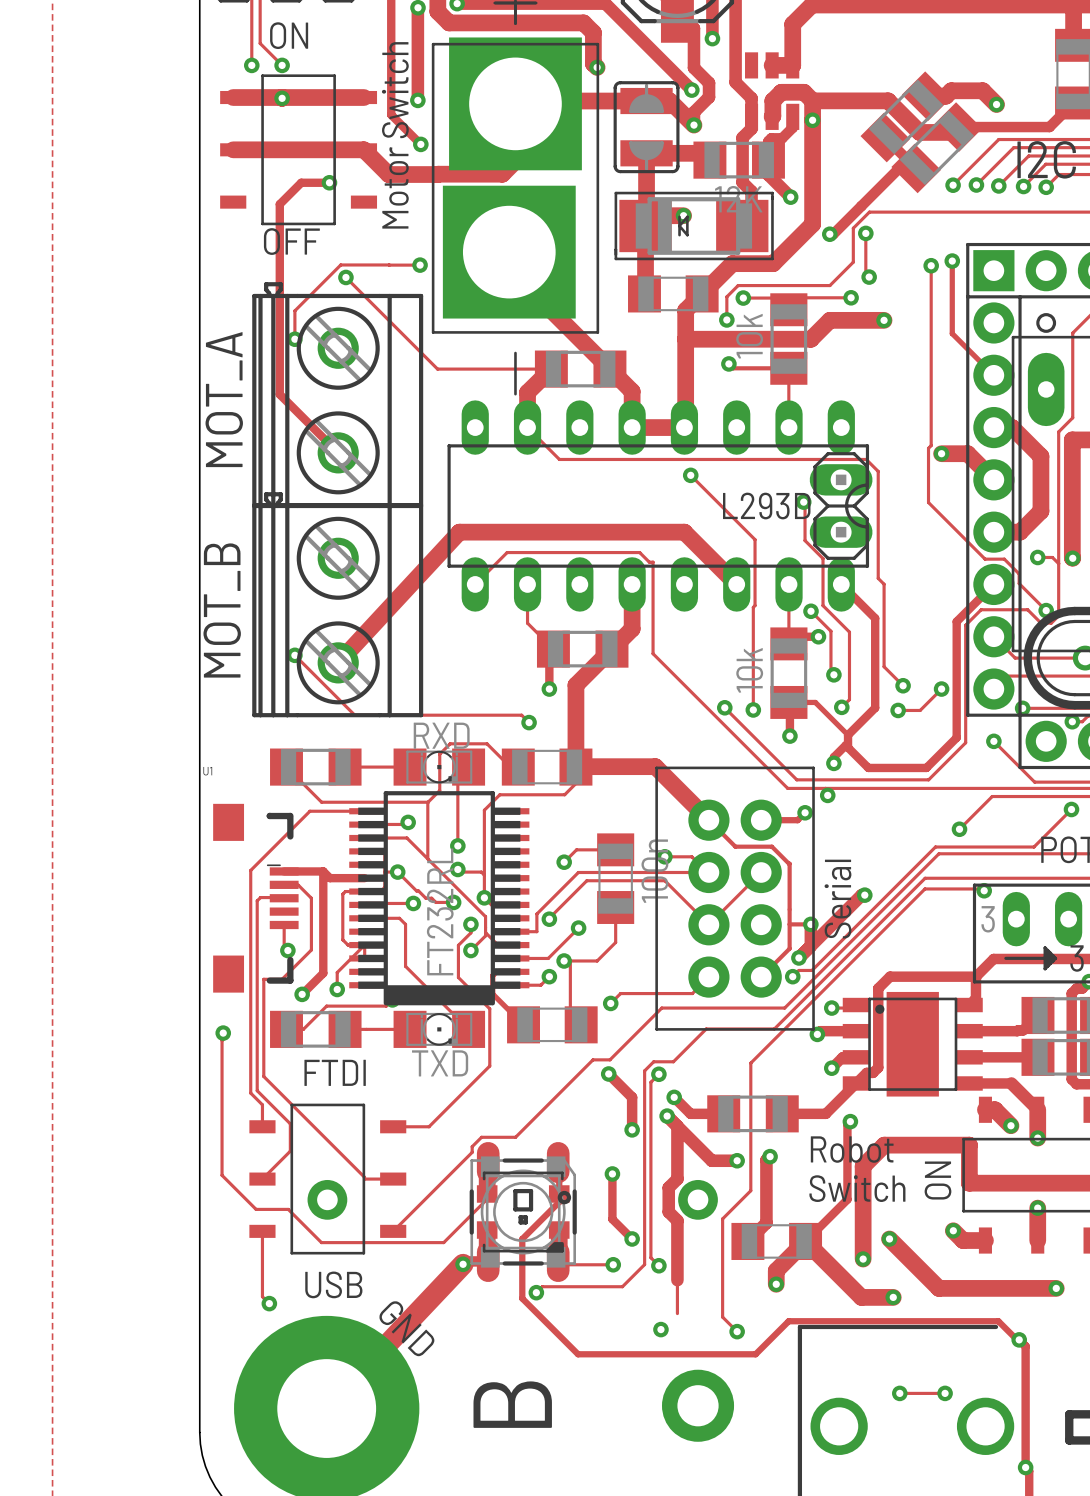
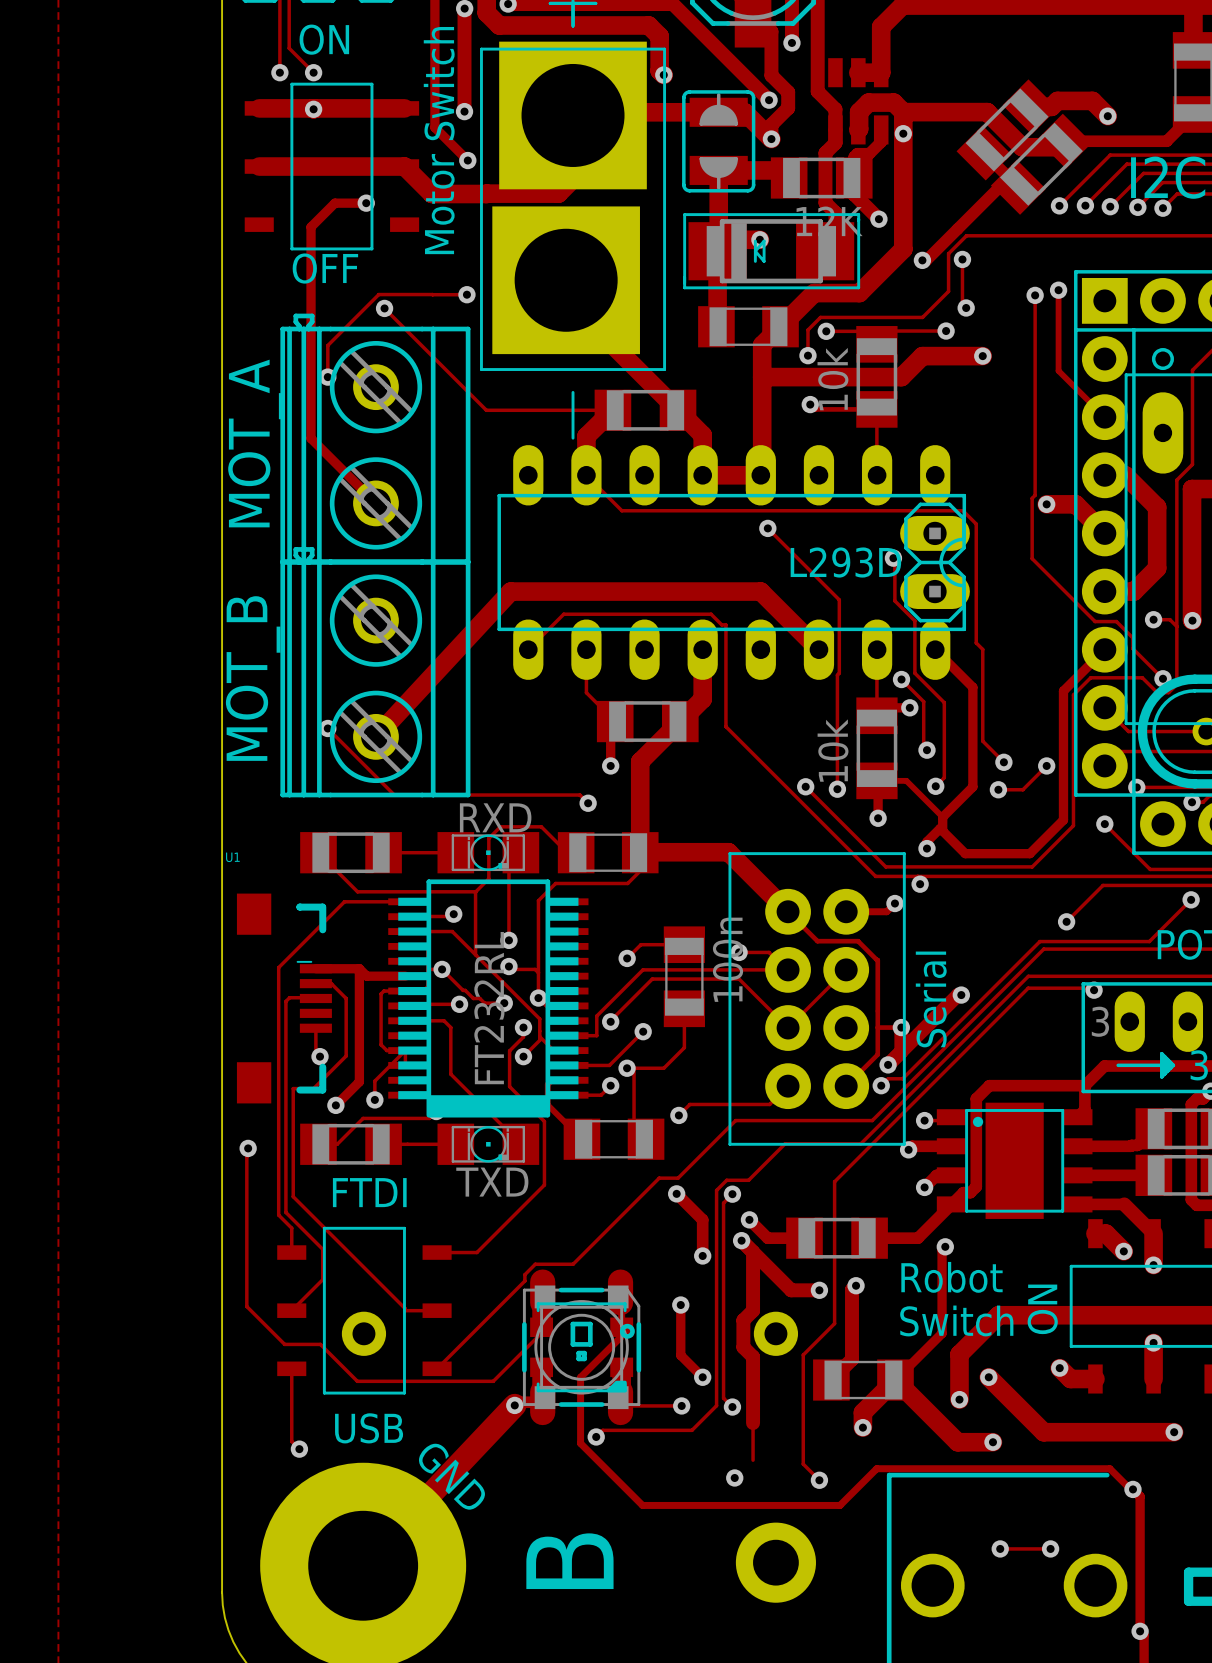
track: (969, 1183) (969, 1145) (884, 1145) (863, 1166) (863, 1218) -> (1077, 1315) (998, 1315) (959, 1354)

